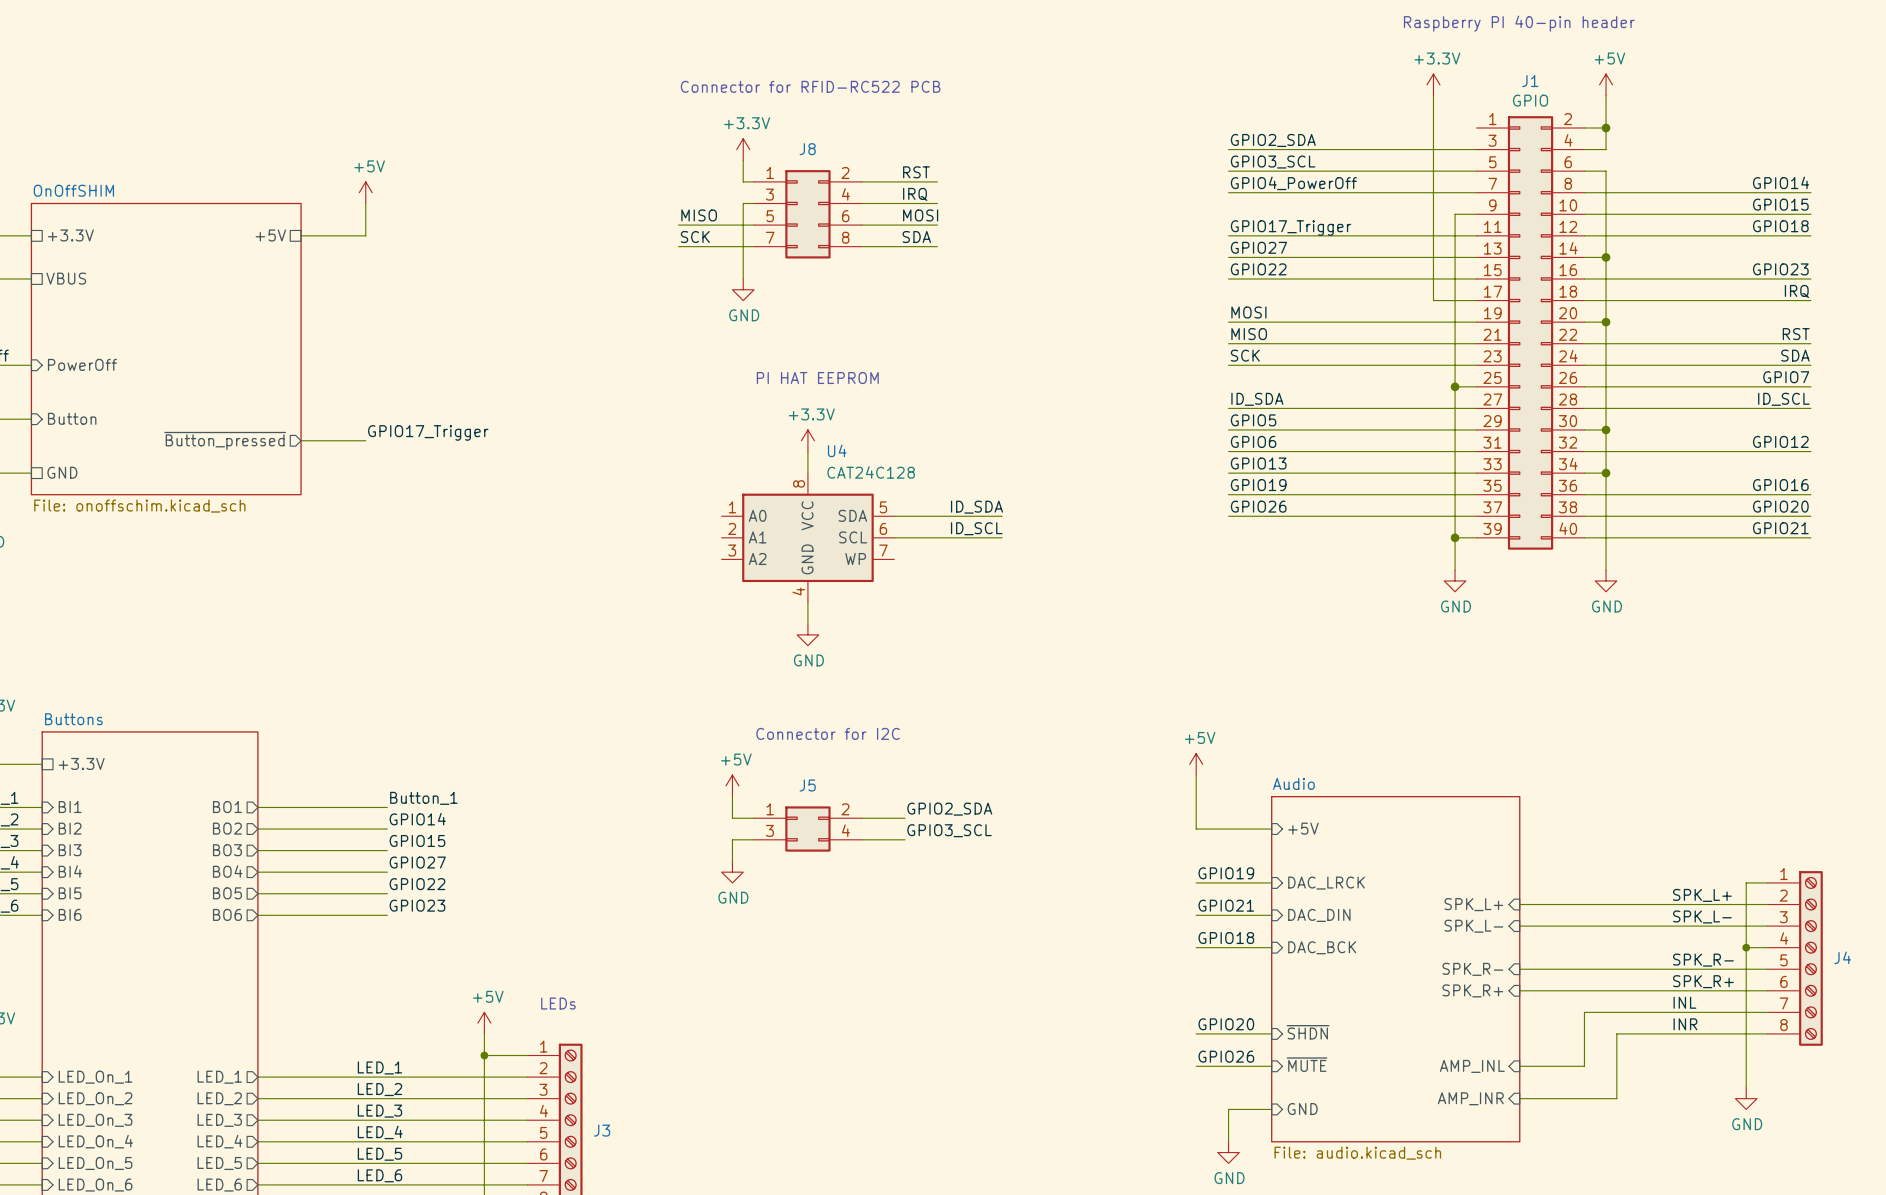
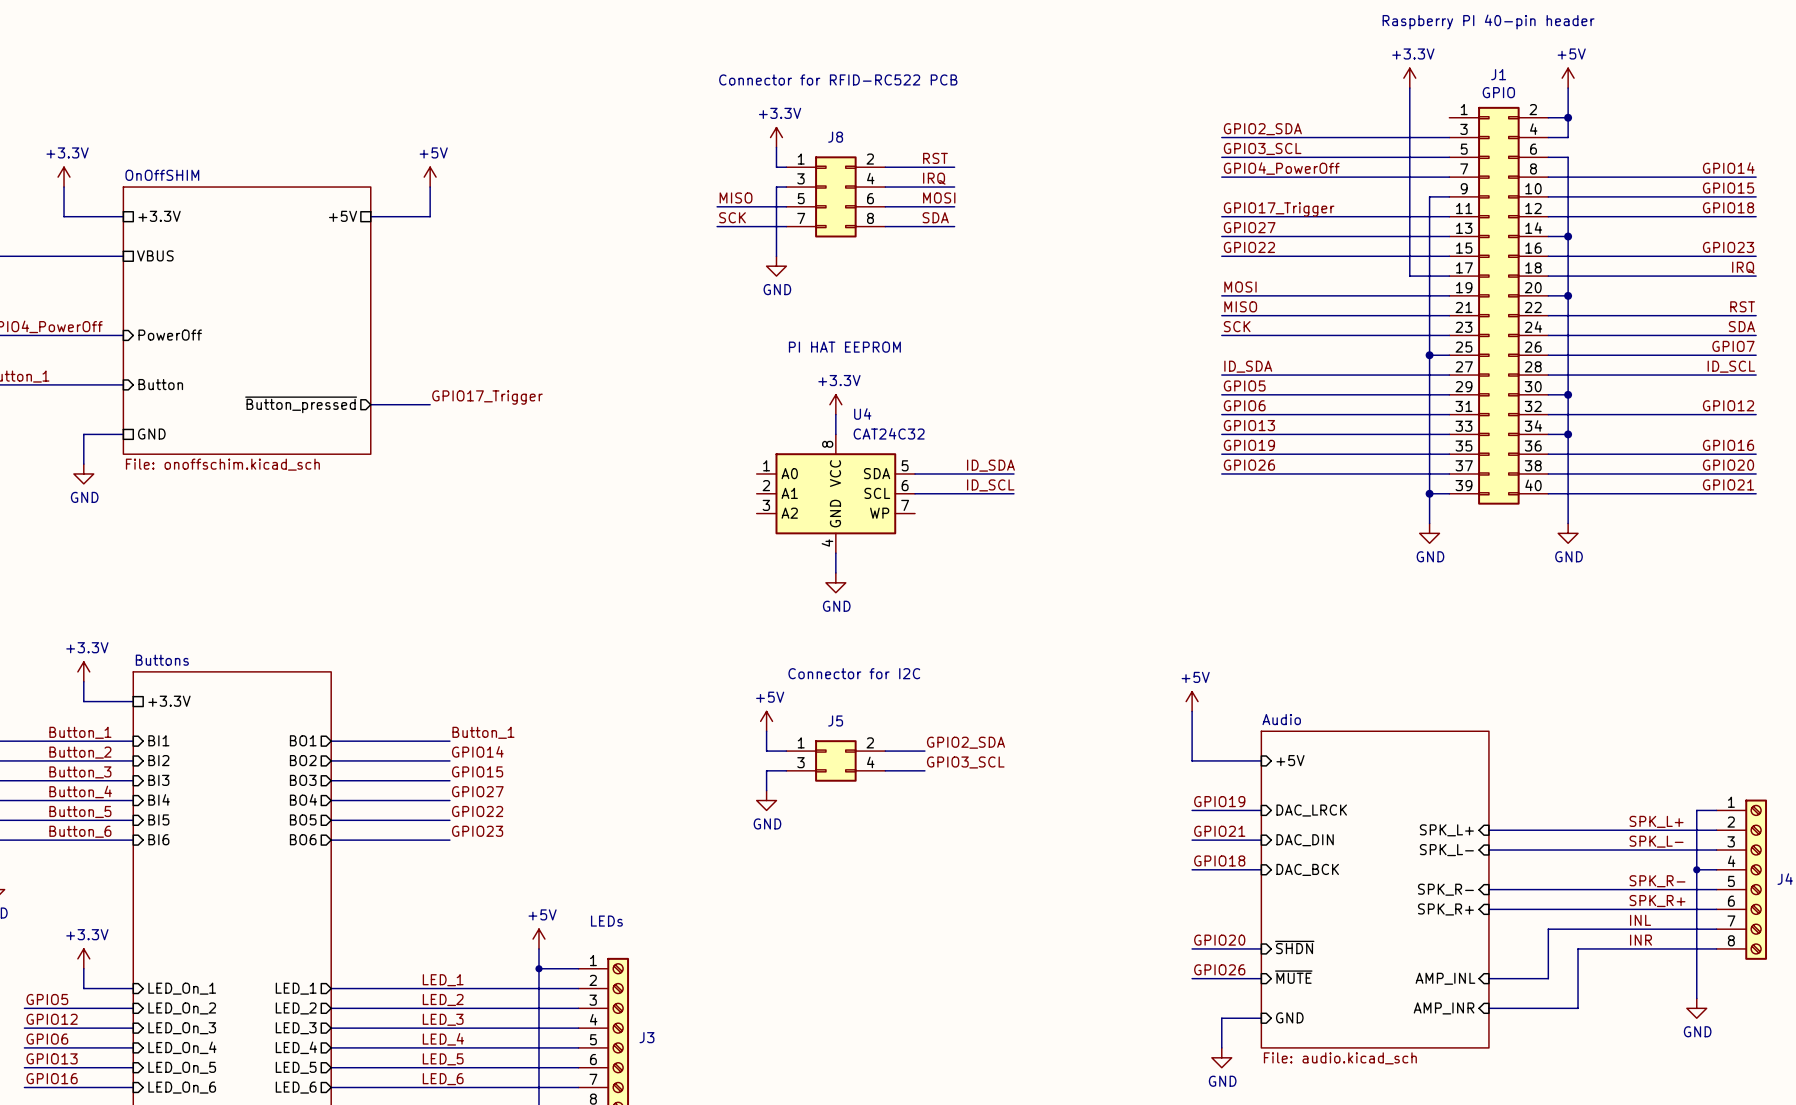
U4 value: CAT24C128 (871, 472) -> CAT24C32 (889, 433)

